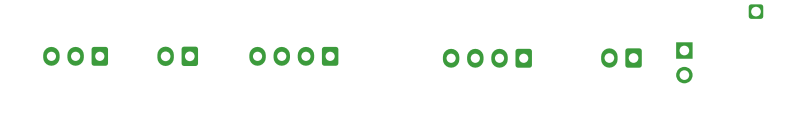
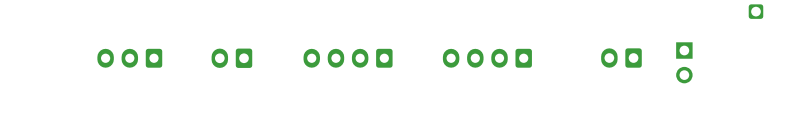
part: (75, 56) -> none
part position: (177, 56) -> (231, 58)
part position: (293, 56) -> (348, 58)
part: none -> (129, 58)

